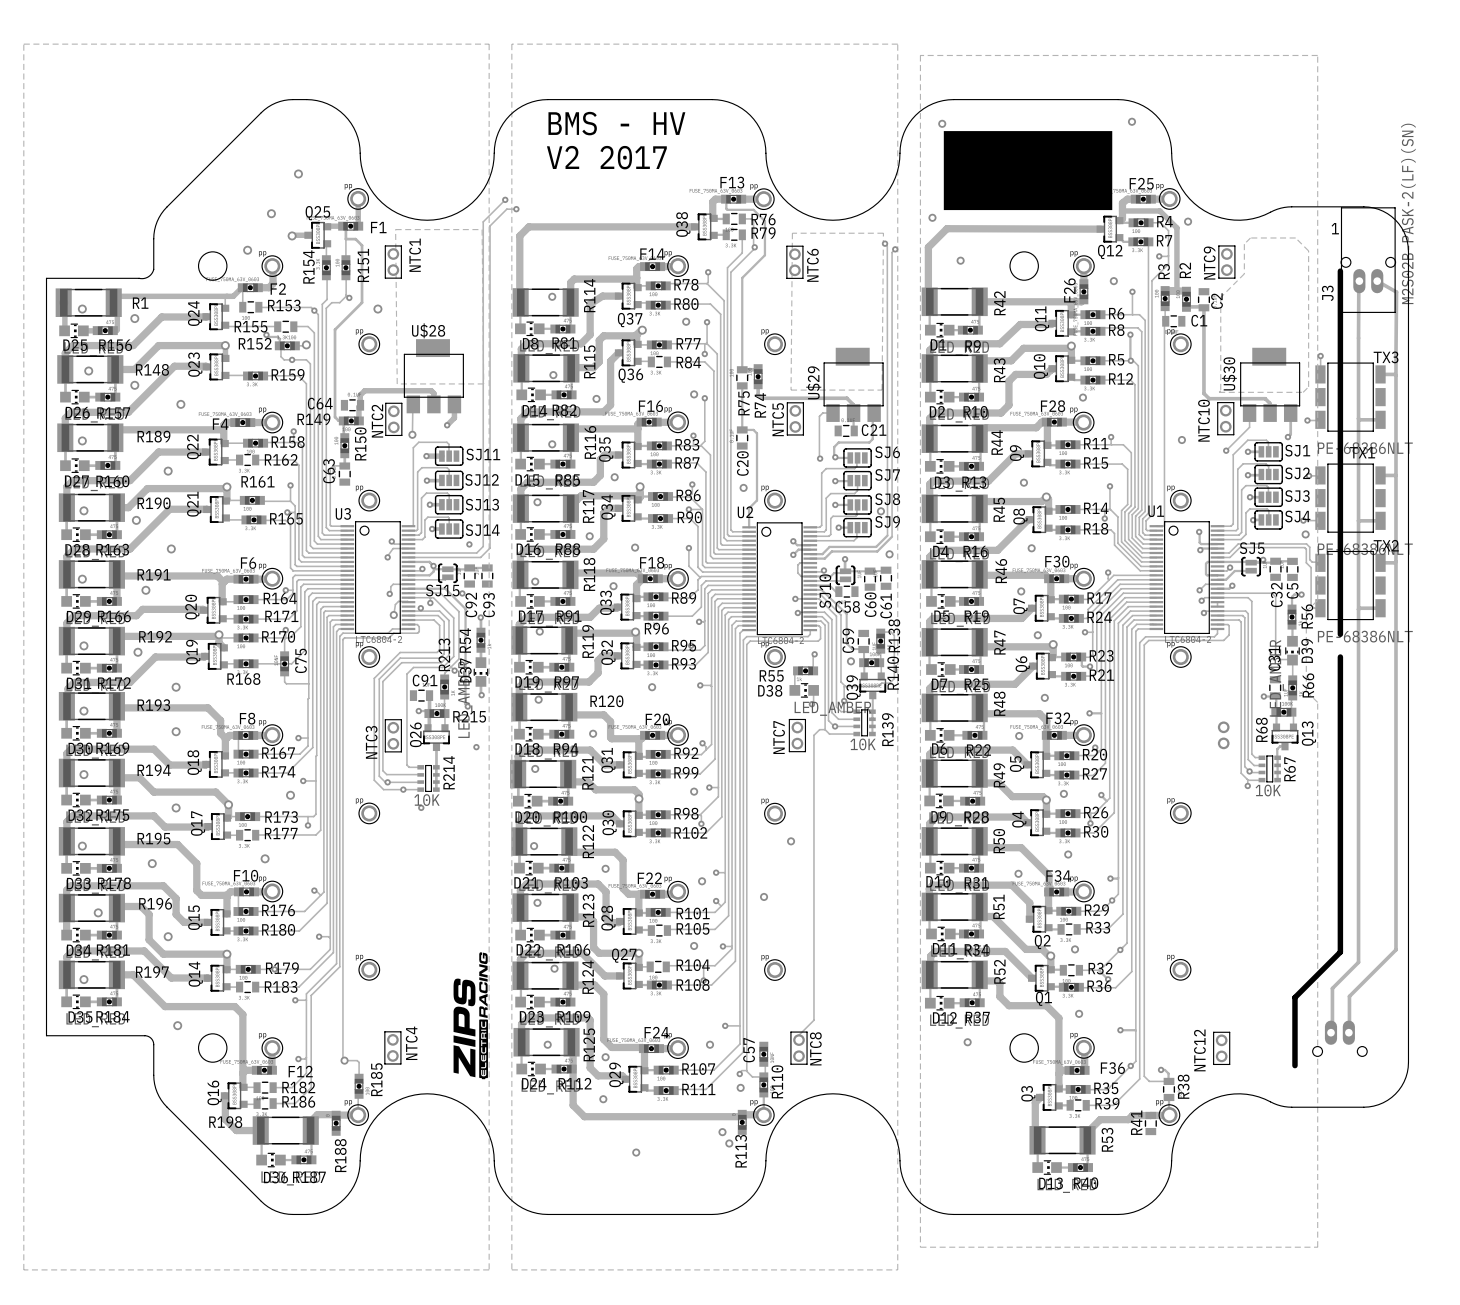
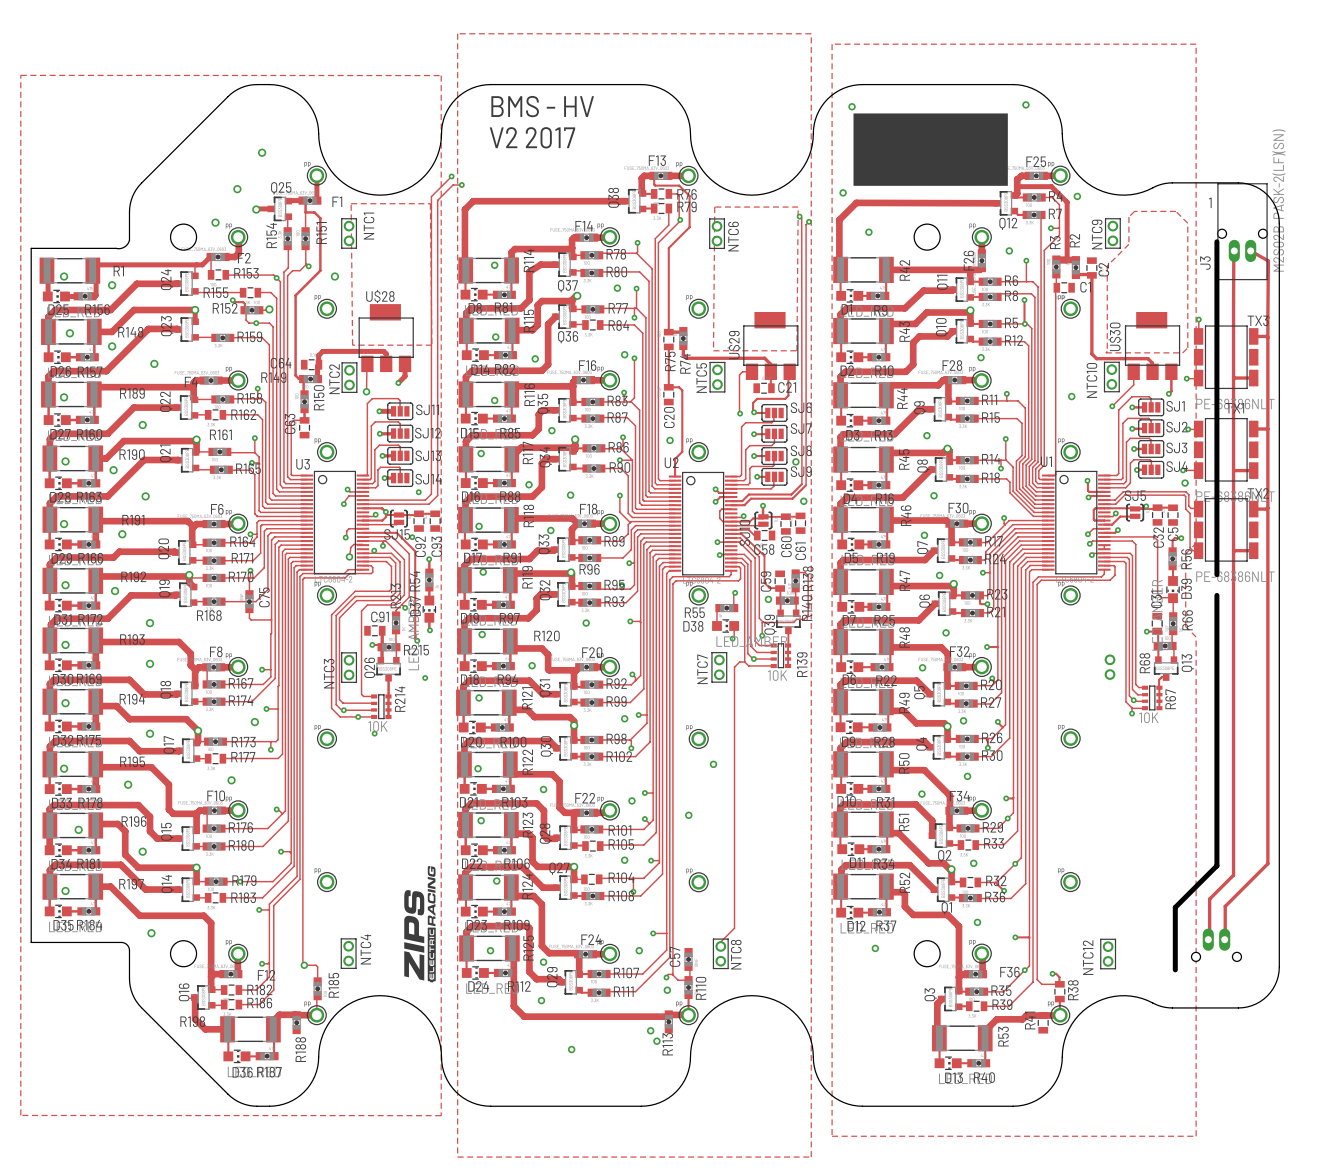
zone outline: (23, 44) (489, 44) (489, 1269) (23, 1269) (23, 44) -> (20, 75) (20, 1115) (441, 1115) (441, 75) (20, 75)

